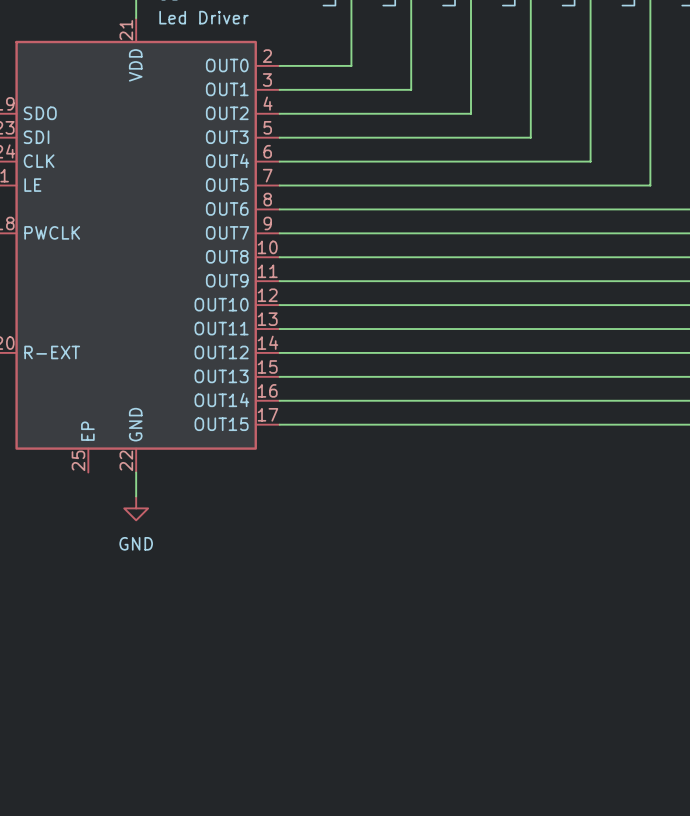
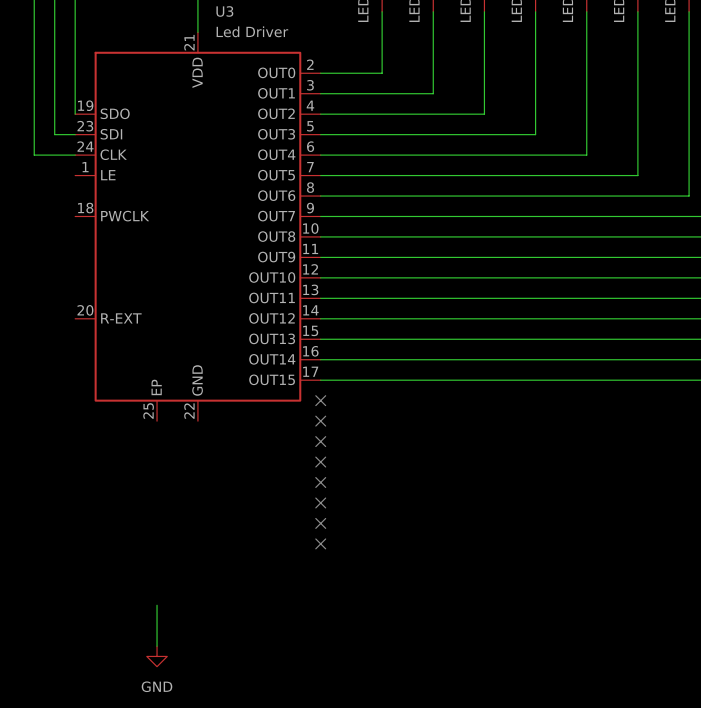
no-connect mark: none -> (320, 400)
wire: (136, 472) (136, 496) -> none
no-connect mark: none -> (320, 421)
no-connect mark: none -> (320, 441)
power symbol: GND (136, 508) -> none
no-connect mark: none -> (320, 462)
no-connect mark: none -> (320, 482)
no-connect mark: none -> (320, 502)
no-connect mark: none -> (320, 523)
no-connect mark: none -> (320, 543)
wire: none -> (157, 605) (157, 646)
power symbol: none -> GND (157, 656)

